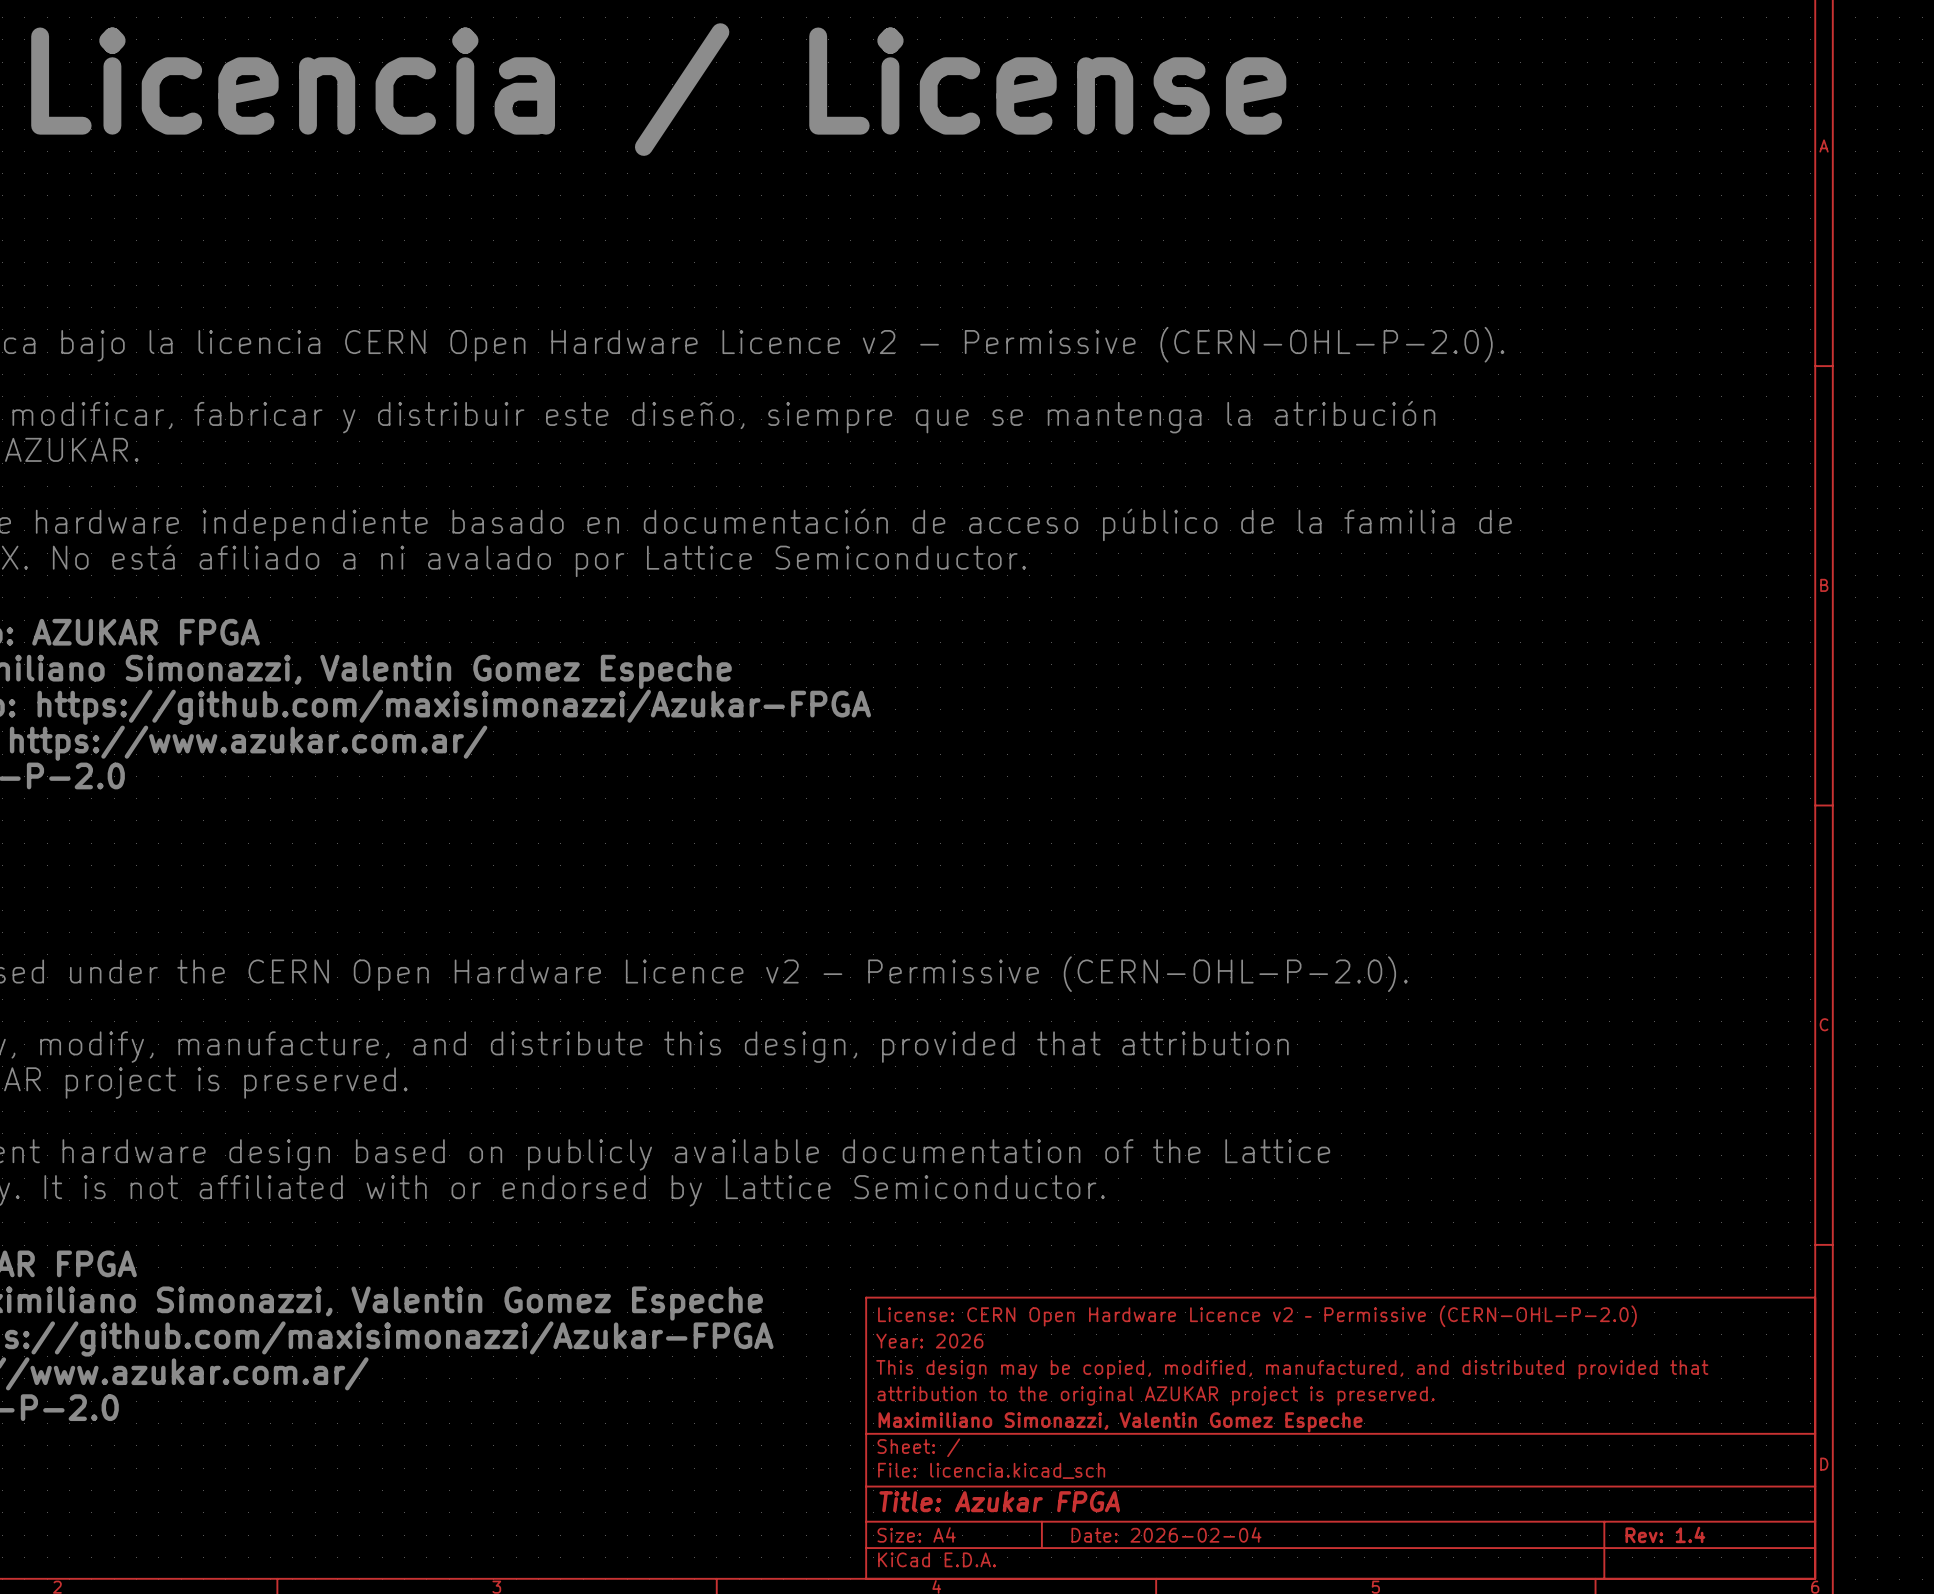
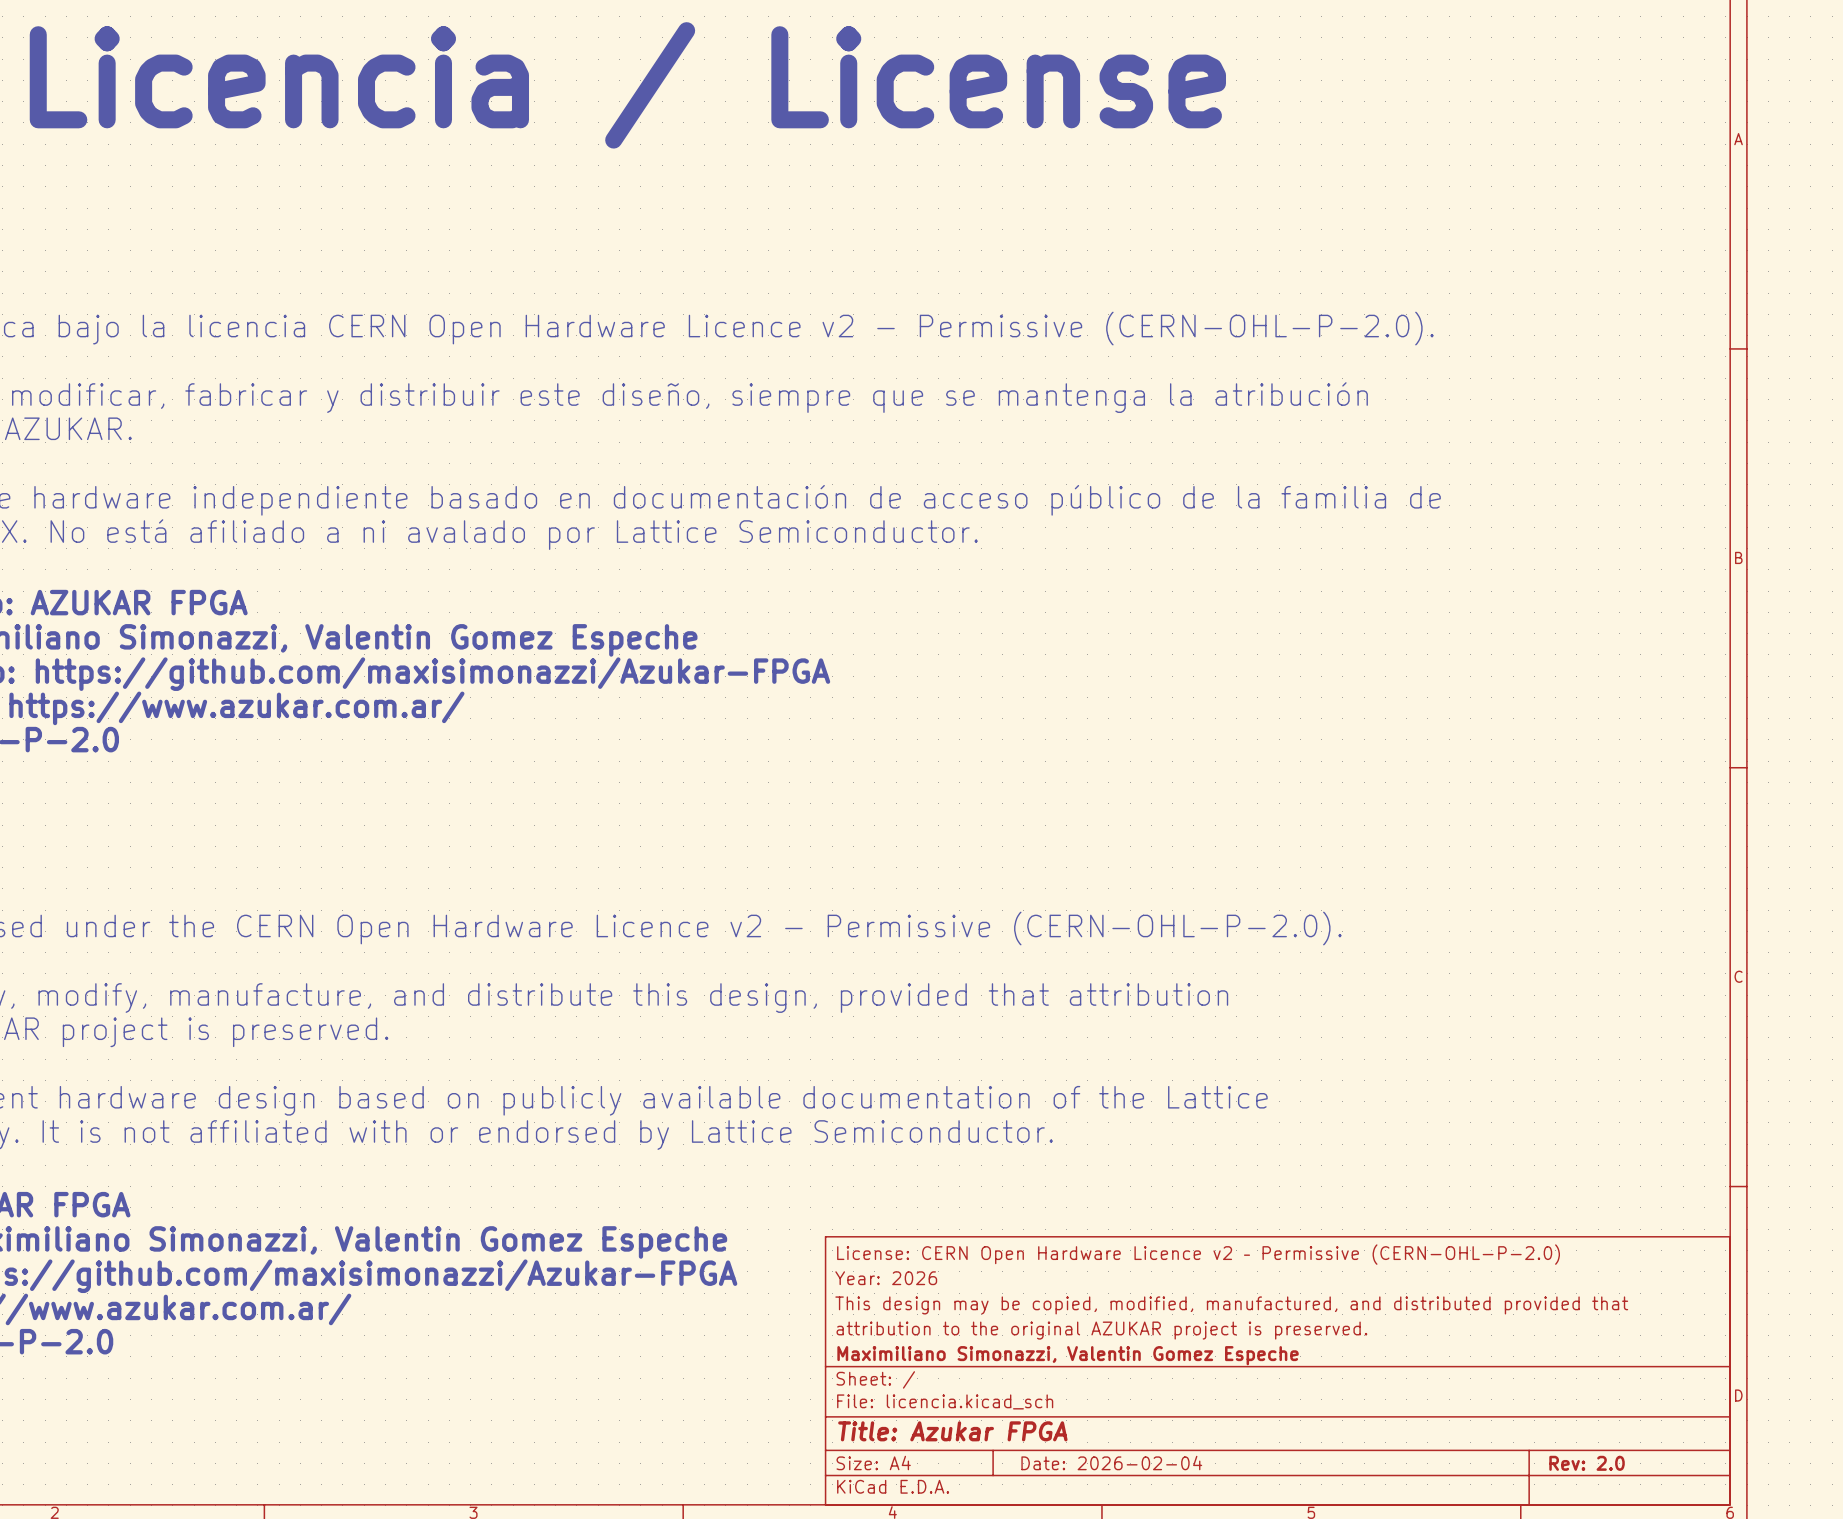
title block: Rev: 1.4 (1665, 1534) -> Rev: 2.0 (1587, 1463)

